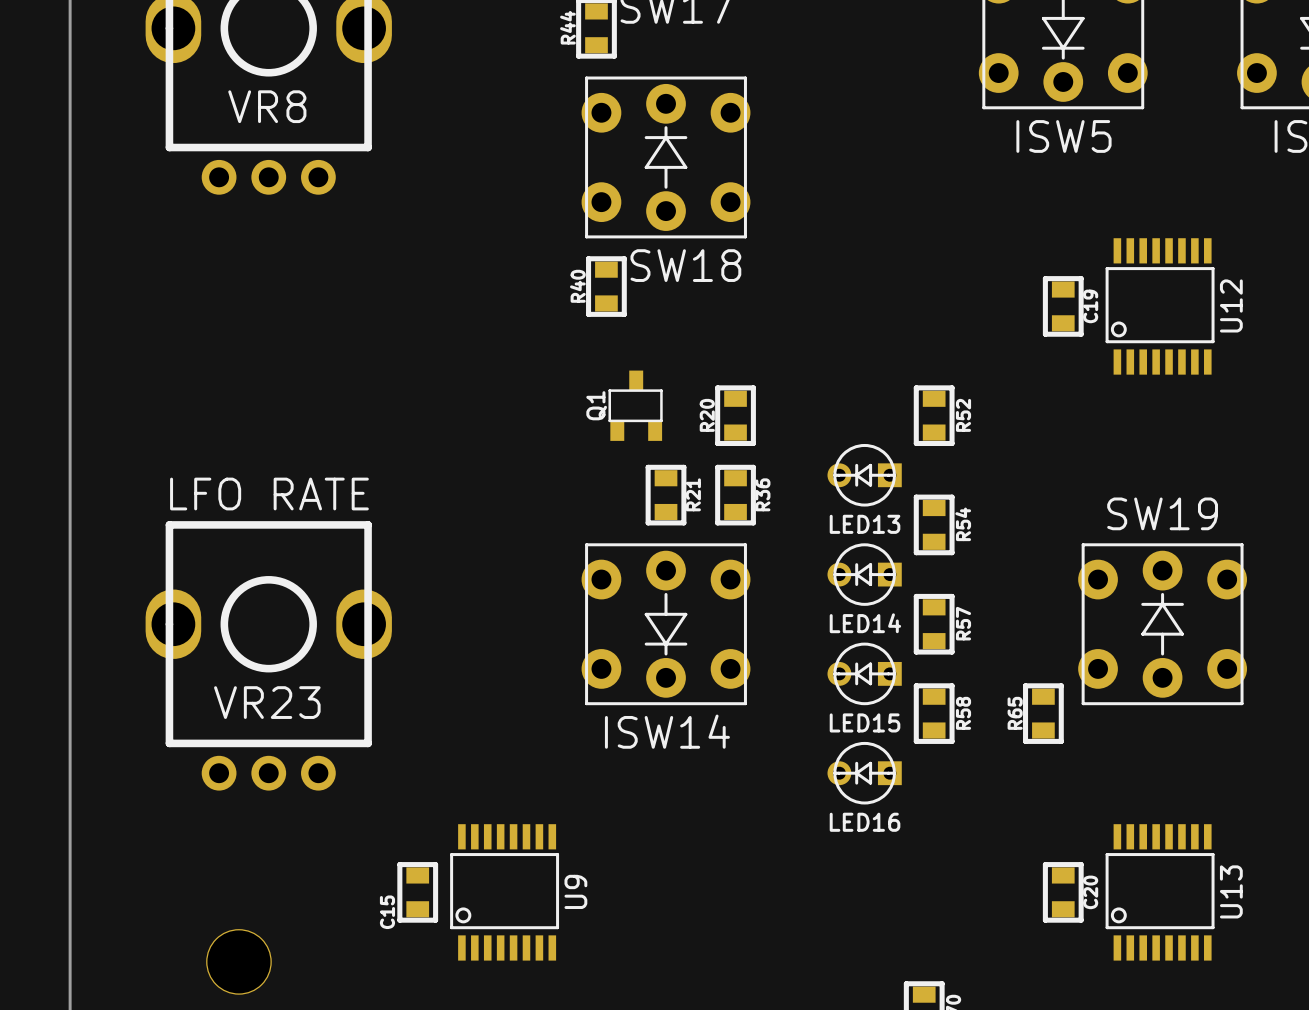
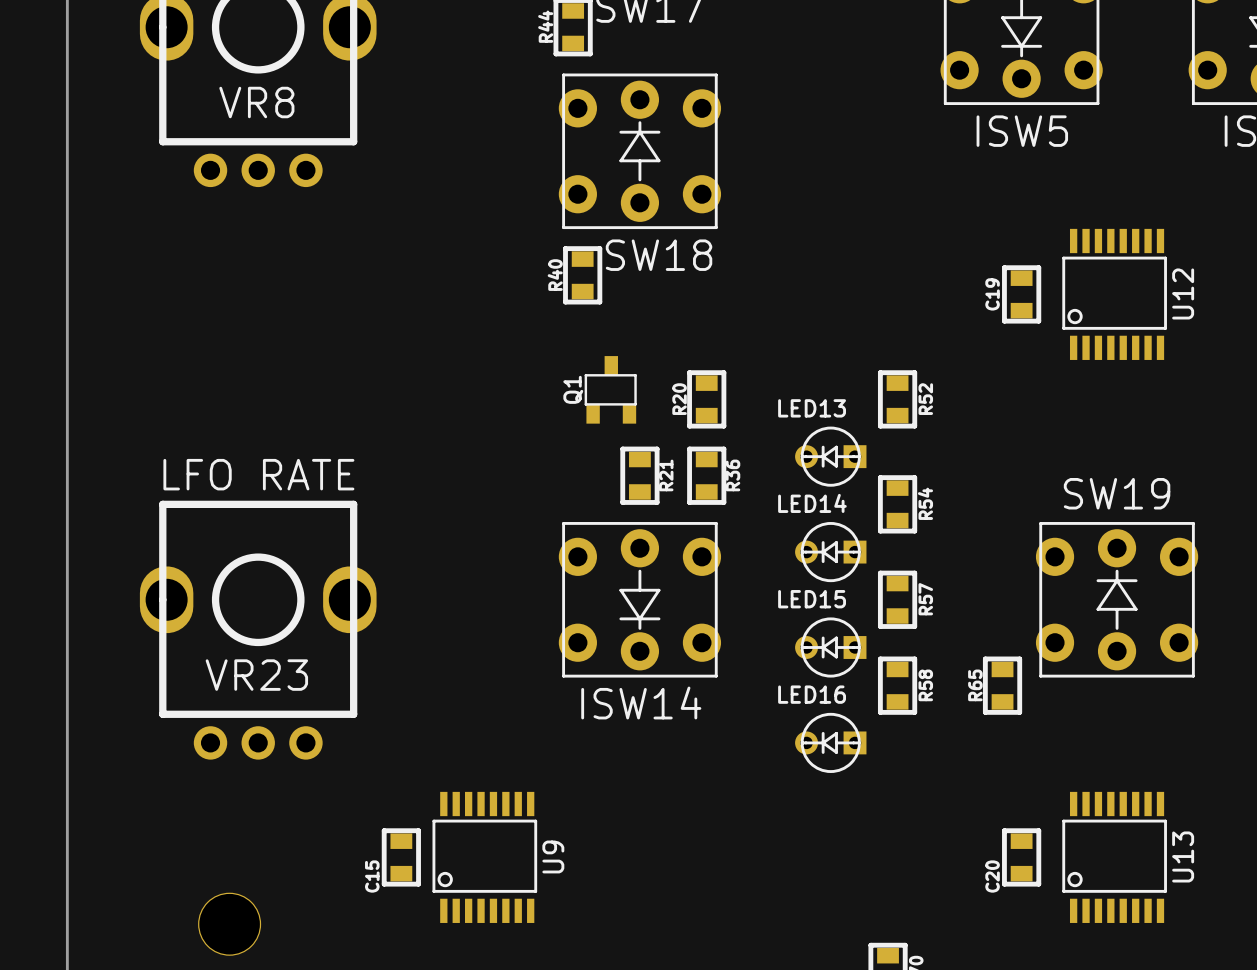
C19 name position: C19 (1090, 306) -> C19 (992, 294)
LED13 name position: LED13 (865, 524) -> LED13 (812, 408)
LED14 name position: LED14 (865, 623) -> LED14 (812, 503)
LED15 name position: LED15 (865, 722) -> LED15 (812, 599)
LED16 name position: LED16 (865, 822) -> LED16 (812, 694)
C20 name position: C20 (1090, 892) -> C20 (992, 876)

